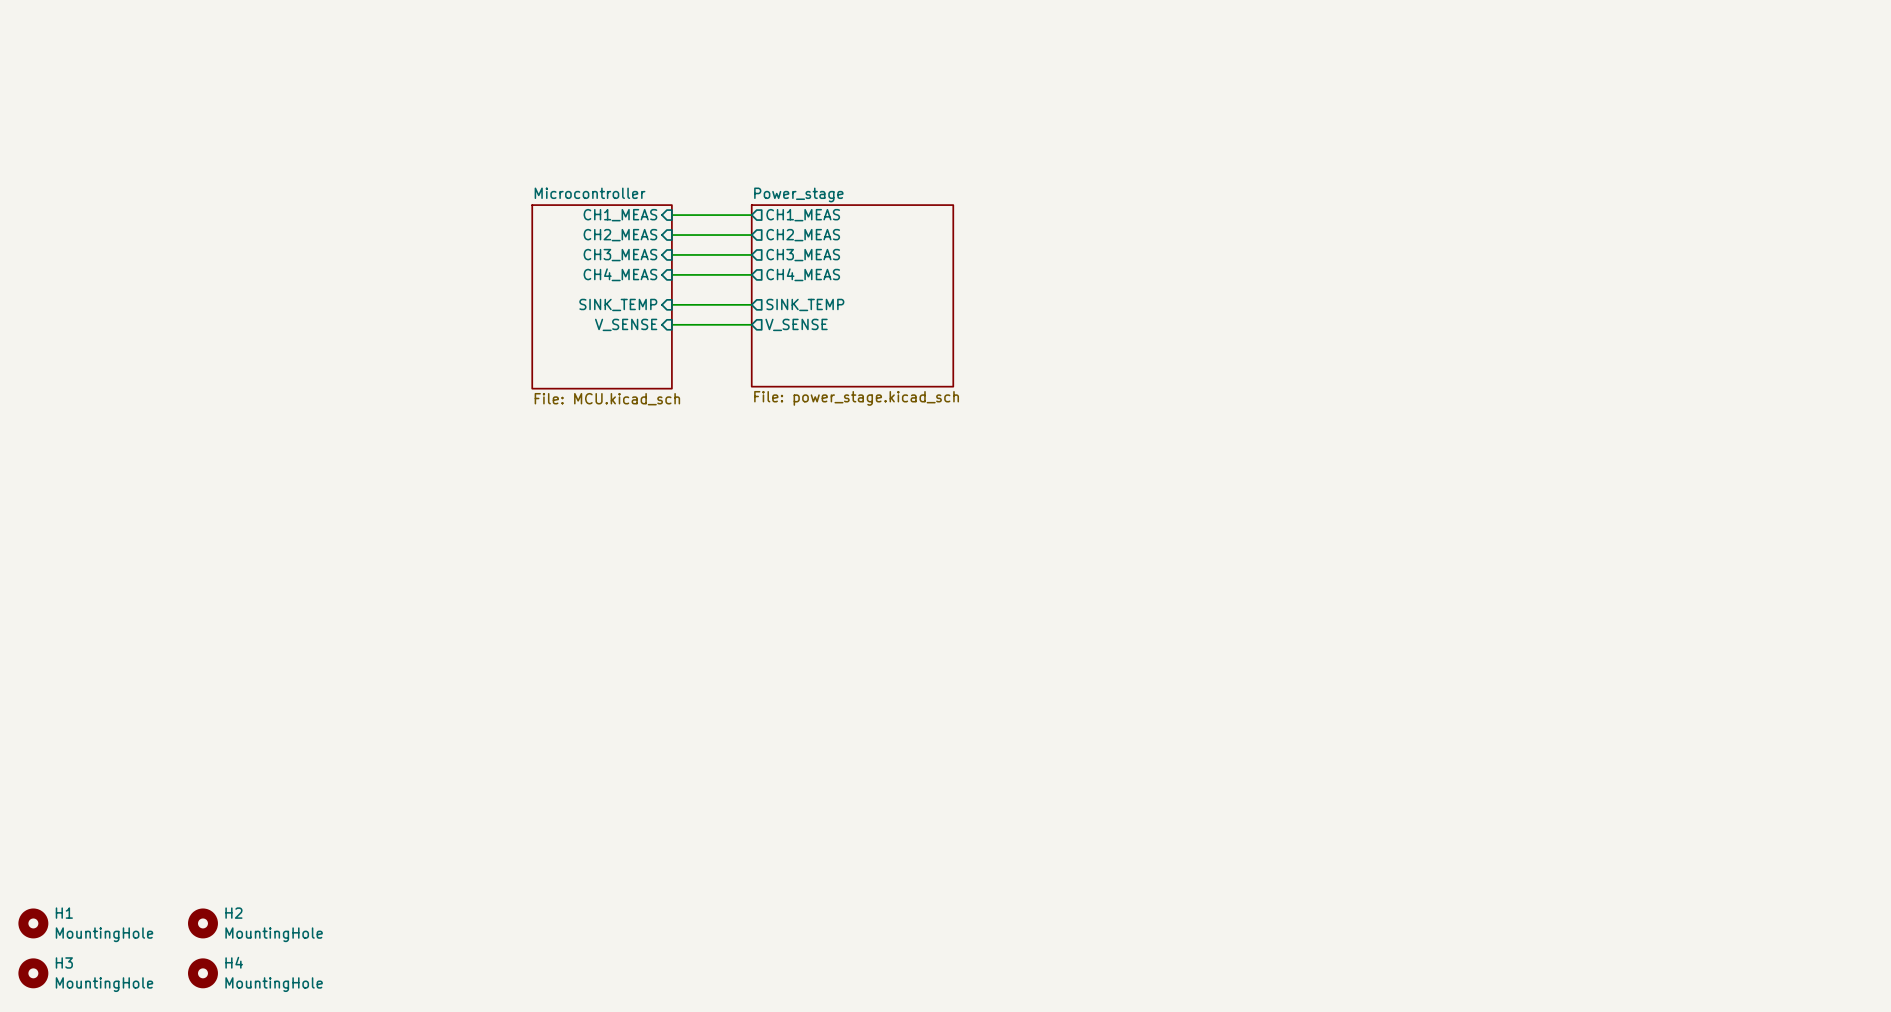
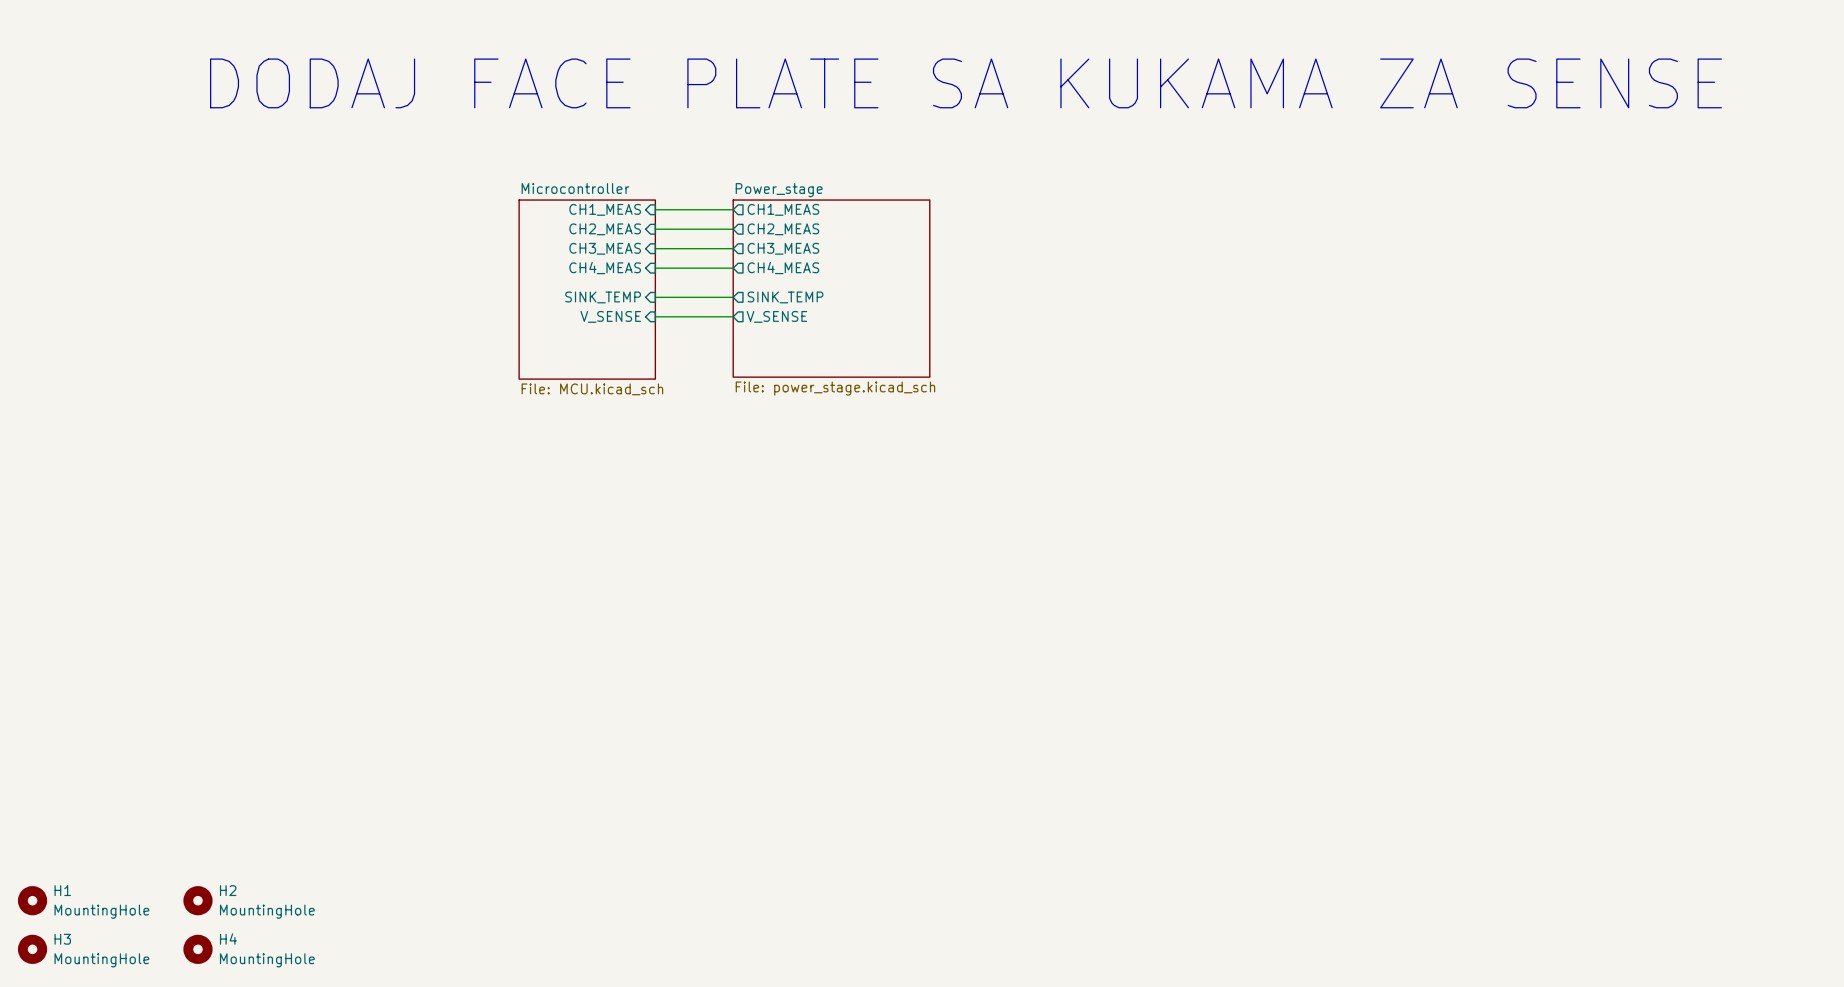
text: none -> DODAJ FACE PLATE SA KUKAMA ZA SENSE (965, 83)

